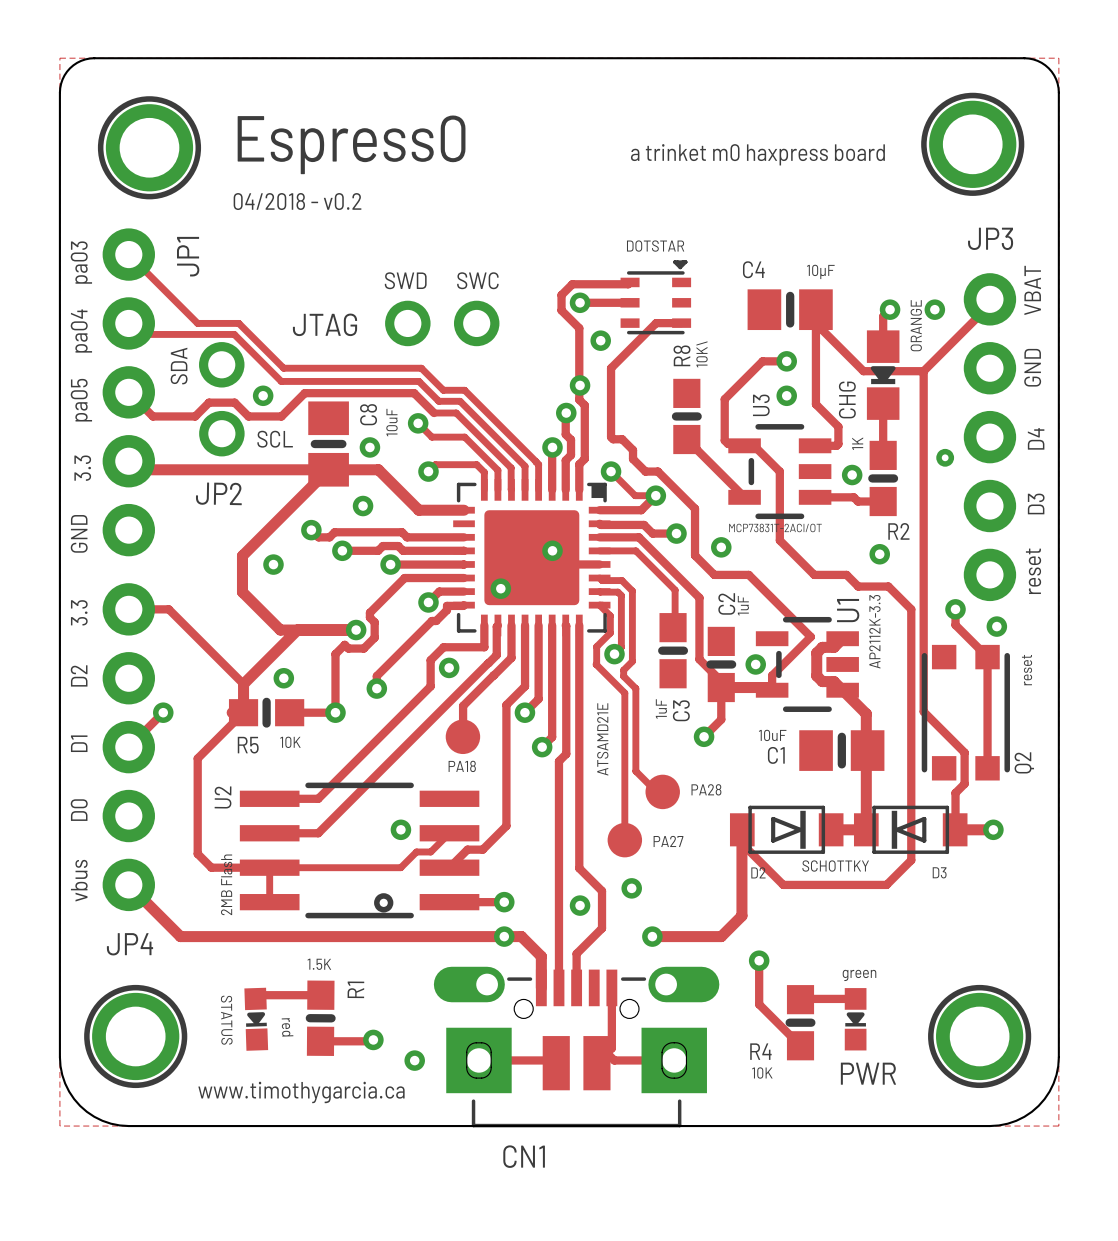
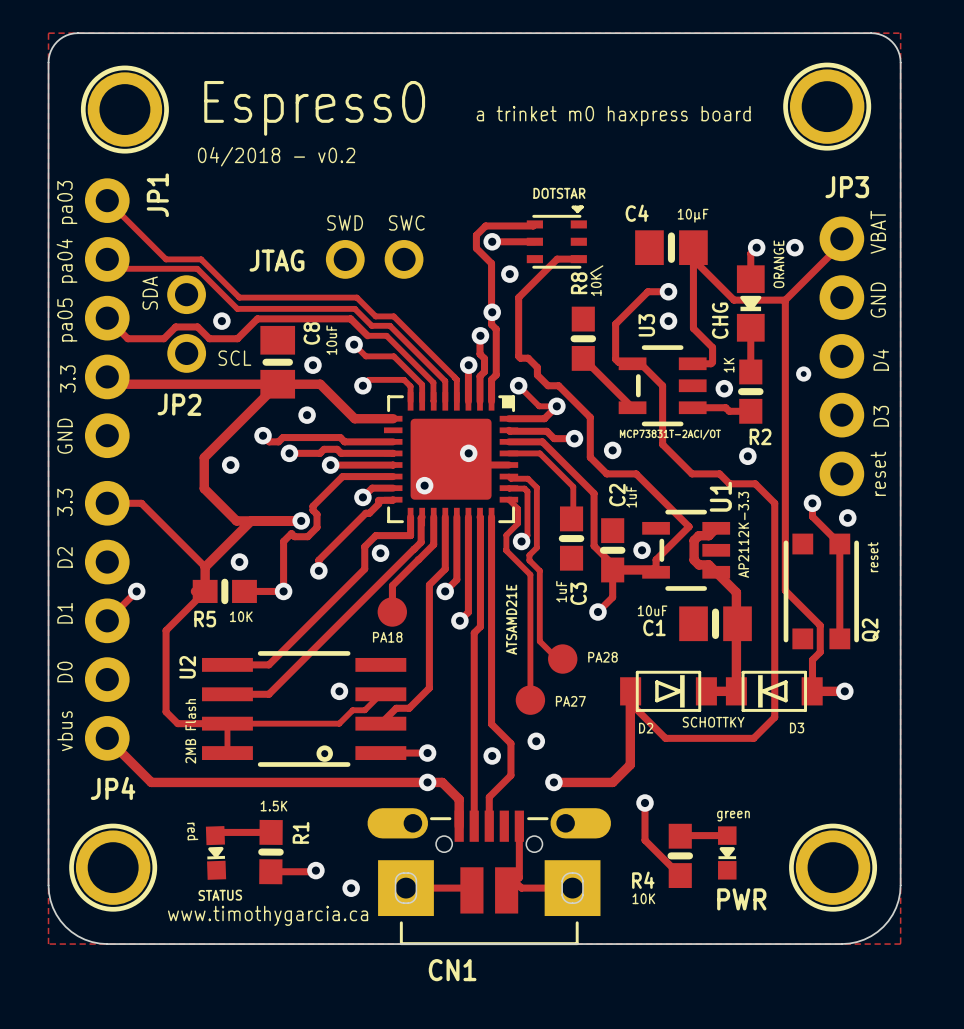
STATUS name rotation: 0° (226, 1020) -> 90° counterclockwise (220, 895)
STATUS name position: STATUS (226, 1020) -> STATUS (220, 895)
STATUS value position: red (287, 1027) -> red (192, 831)

